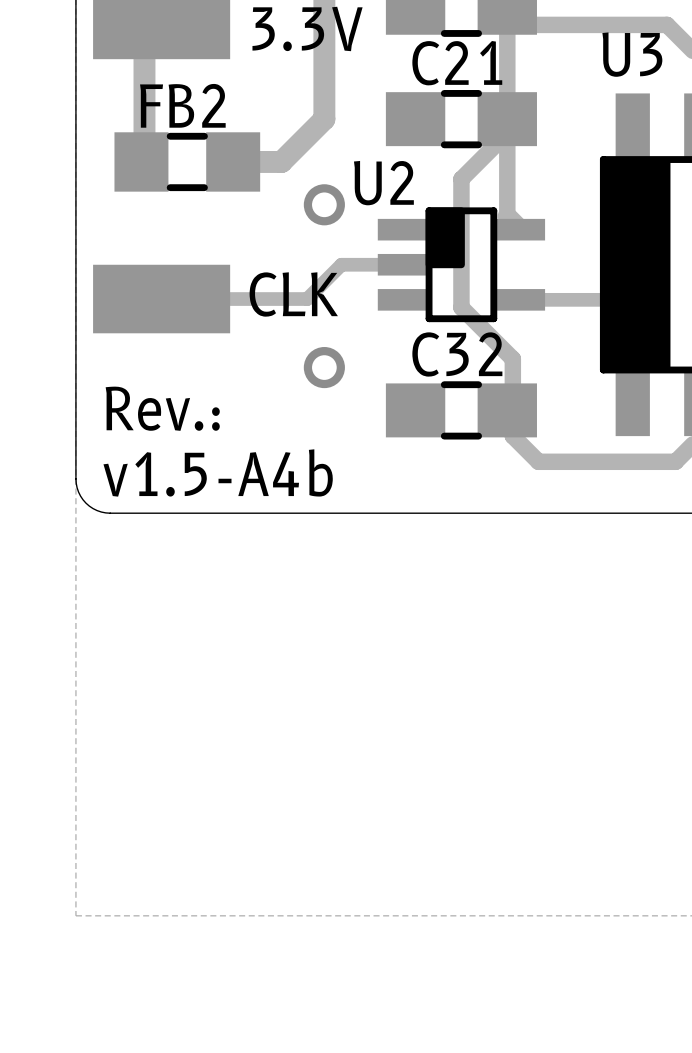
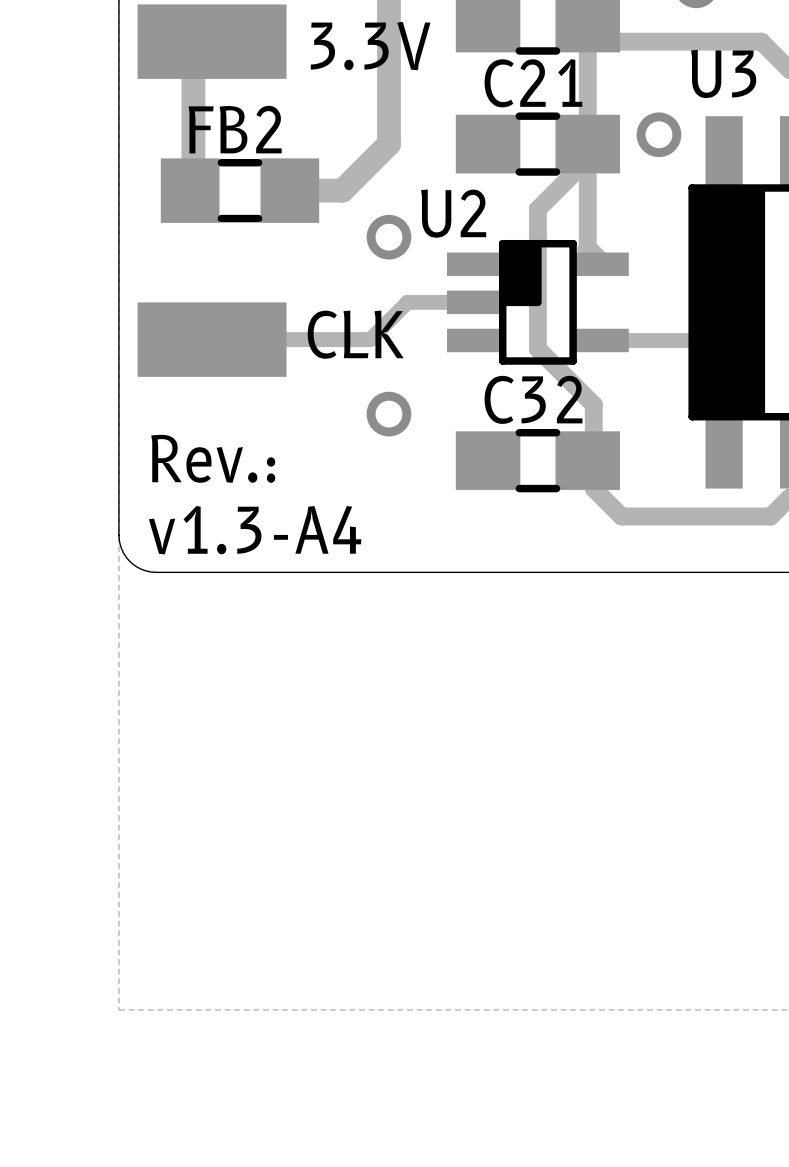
via: none -> (658, 134)
text: v1.5-A4b (218, 472) -> v1.3-A4 (255, 530)

